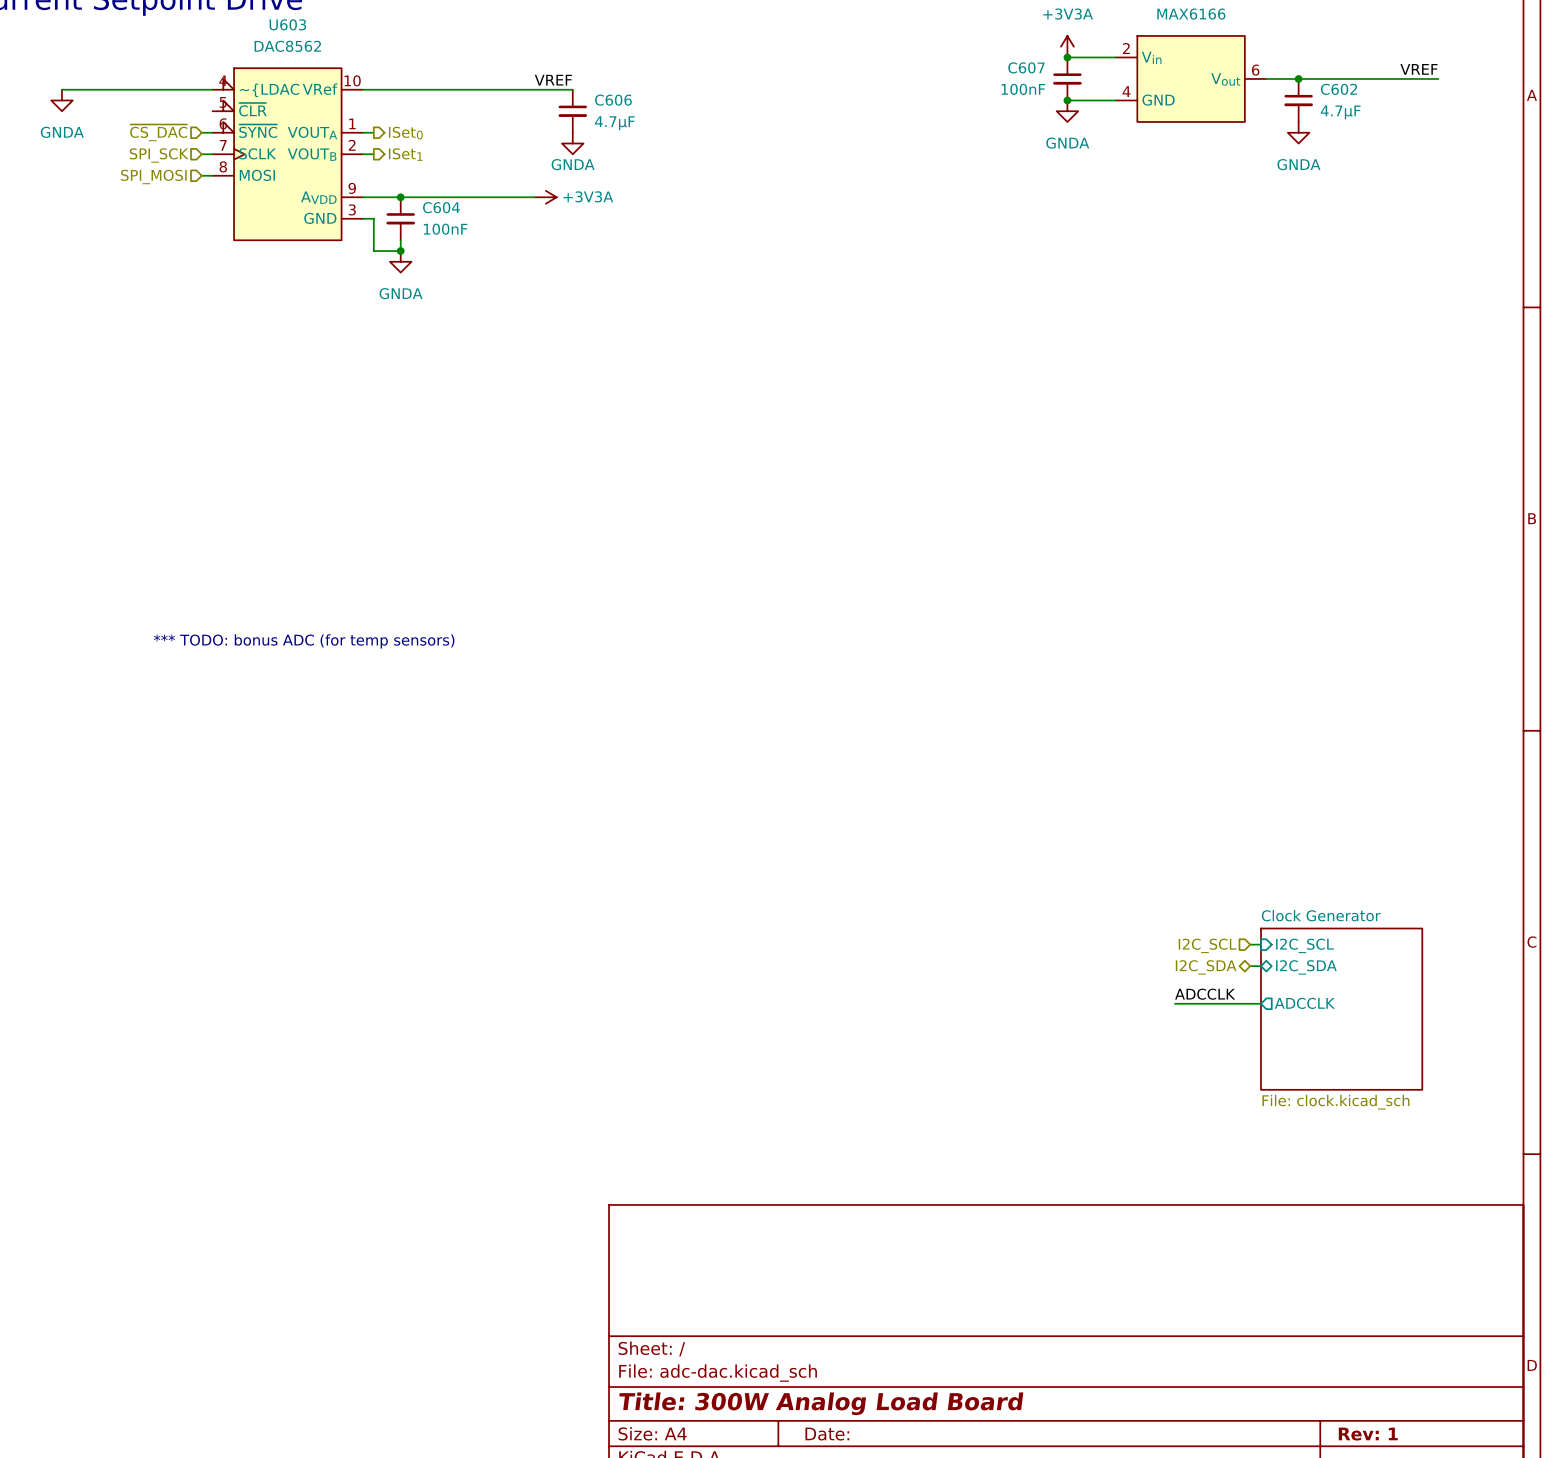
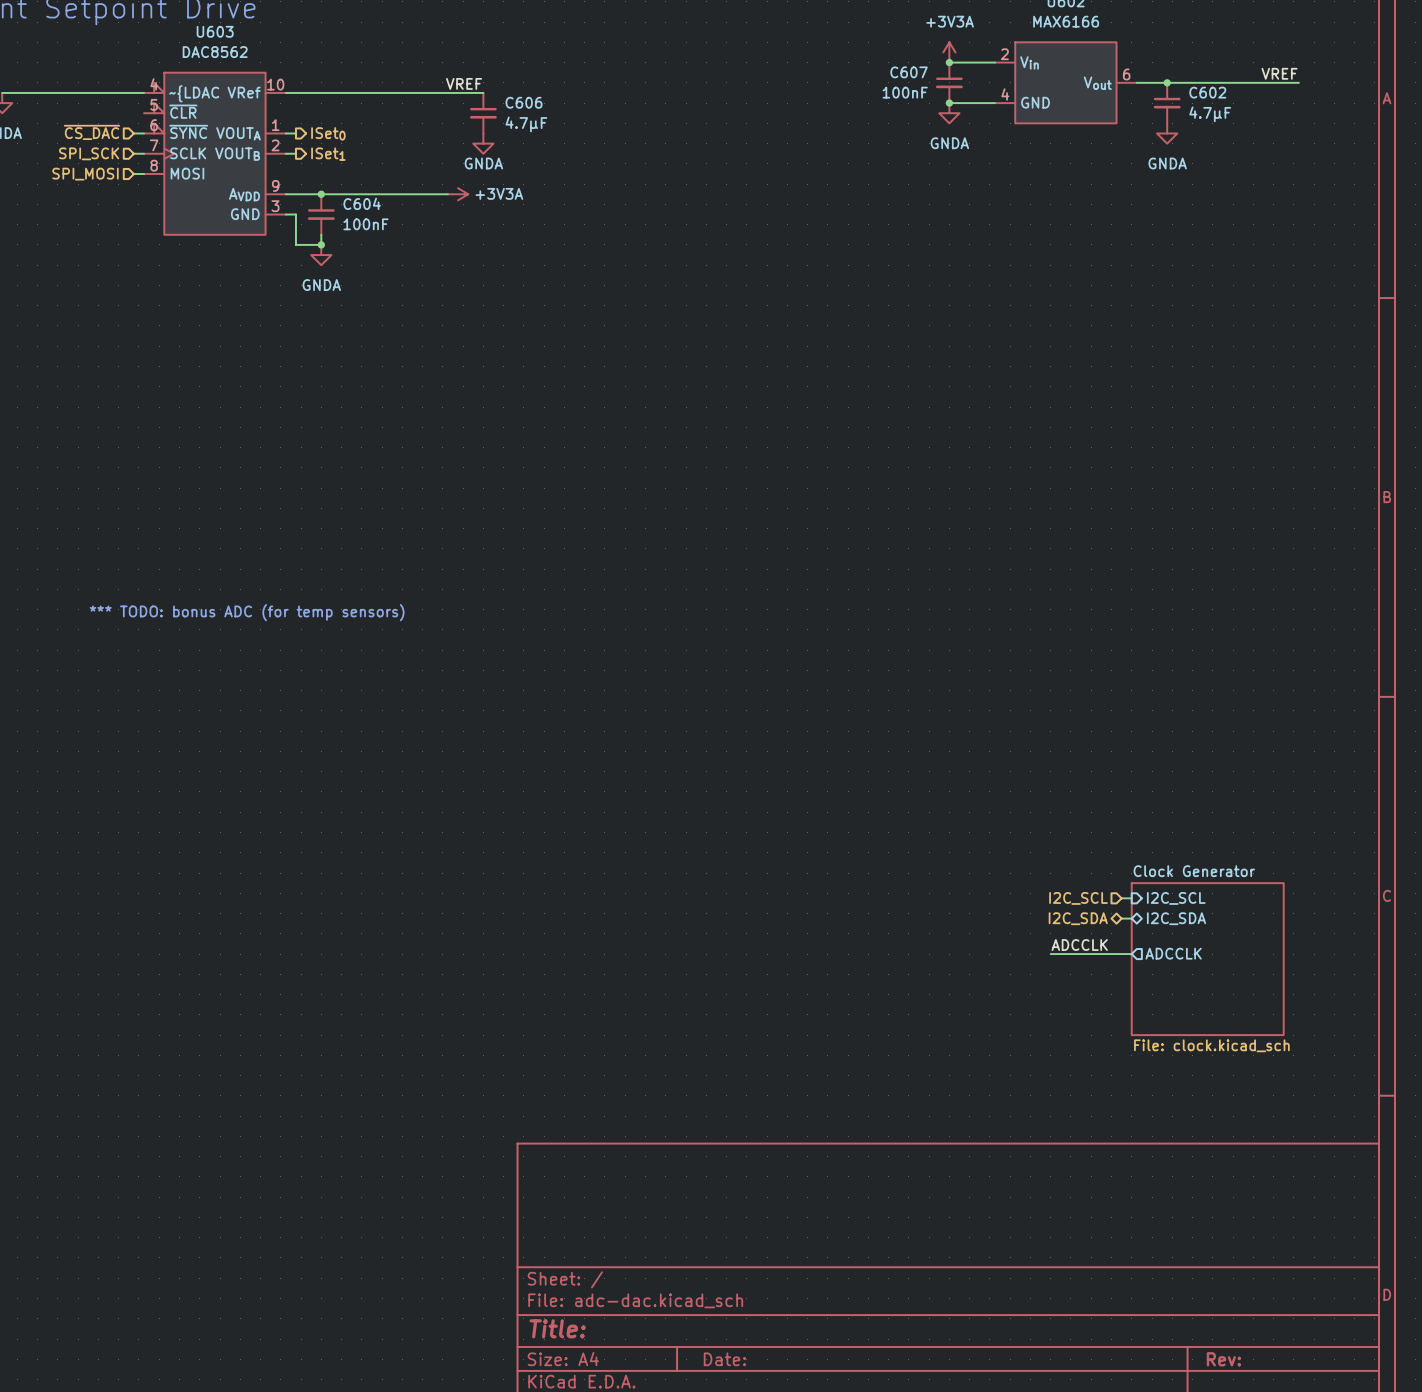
title block: Title: 300W Analog Load Board (821, 1403) -> Title: (557, 1328)
title block: Rev: 1 (1368, 1434) -> Rev: (1223, 1359)

